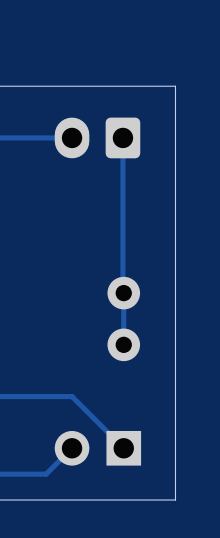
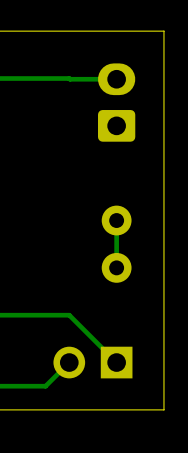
track: none -> (69, 78) (117, 79)
part rotation: 0° (97, 137) -> 90° clockwise (116, 102)
track: (122, 137) (122, 292) -> none

